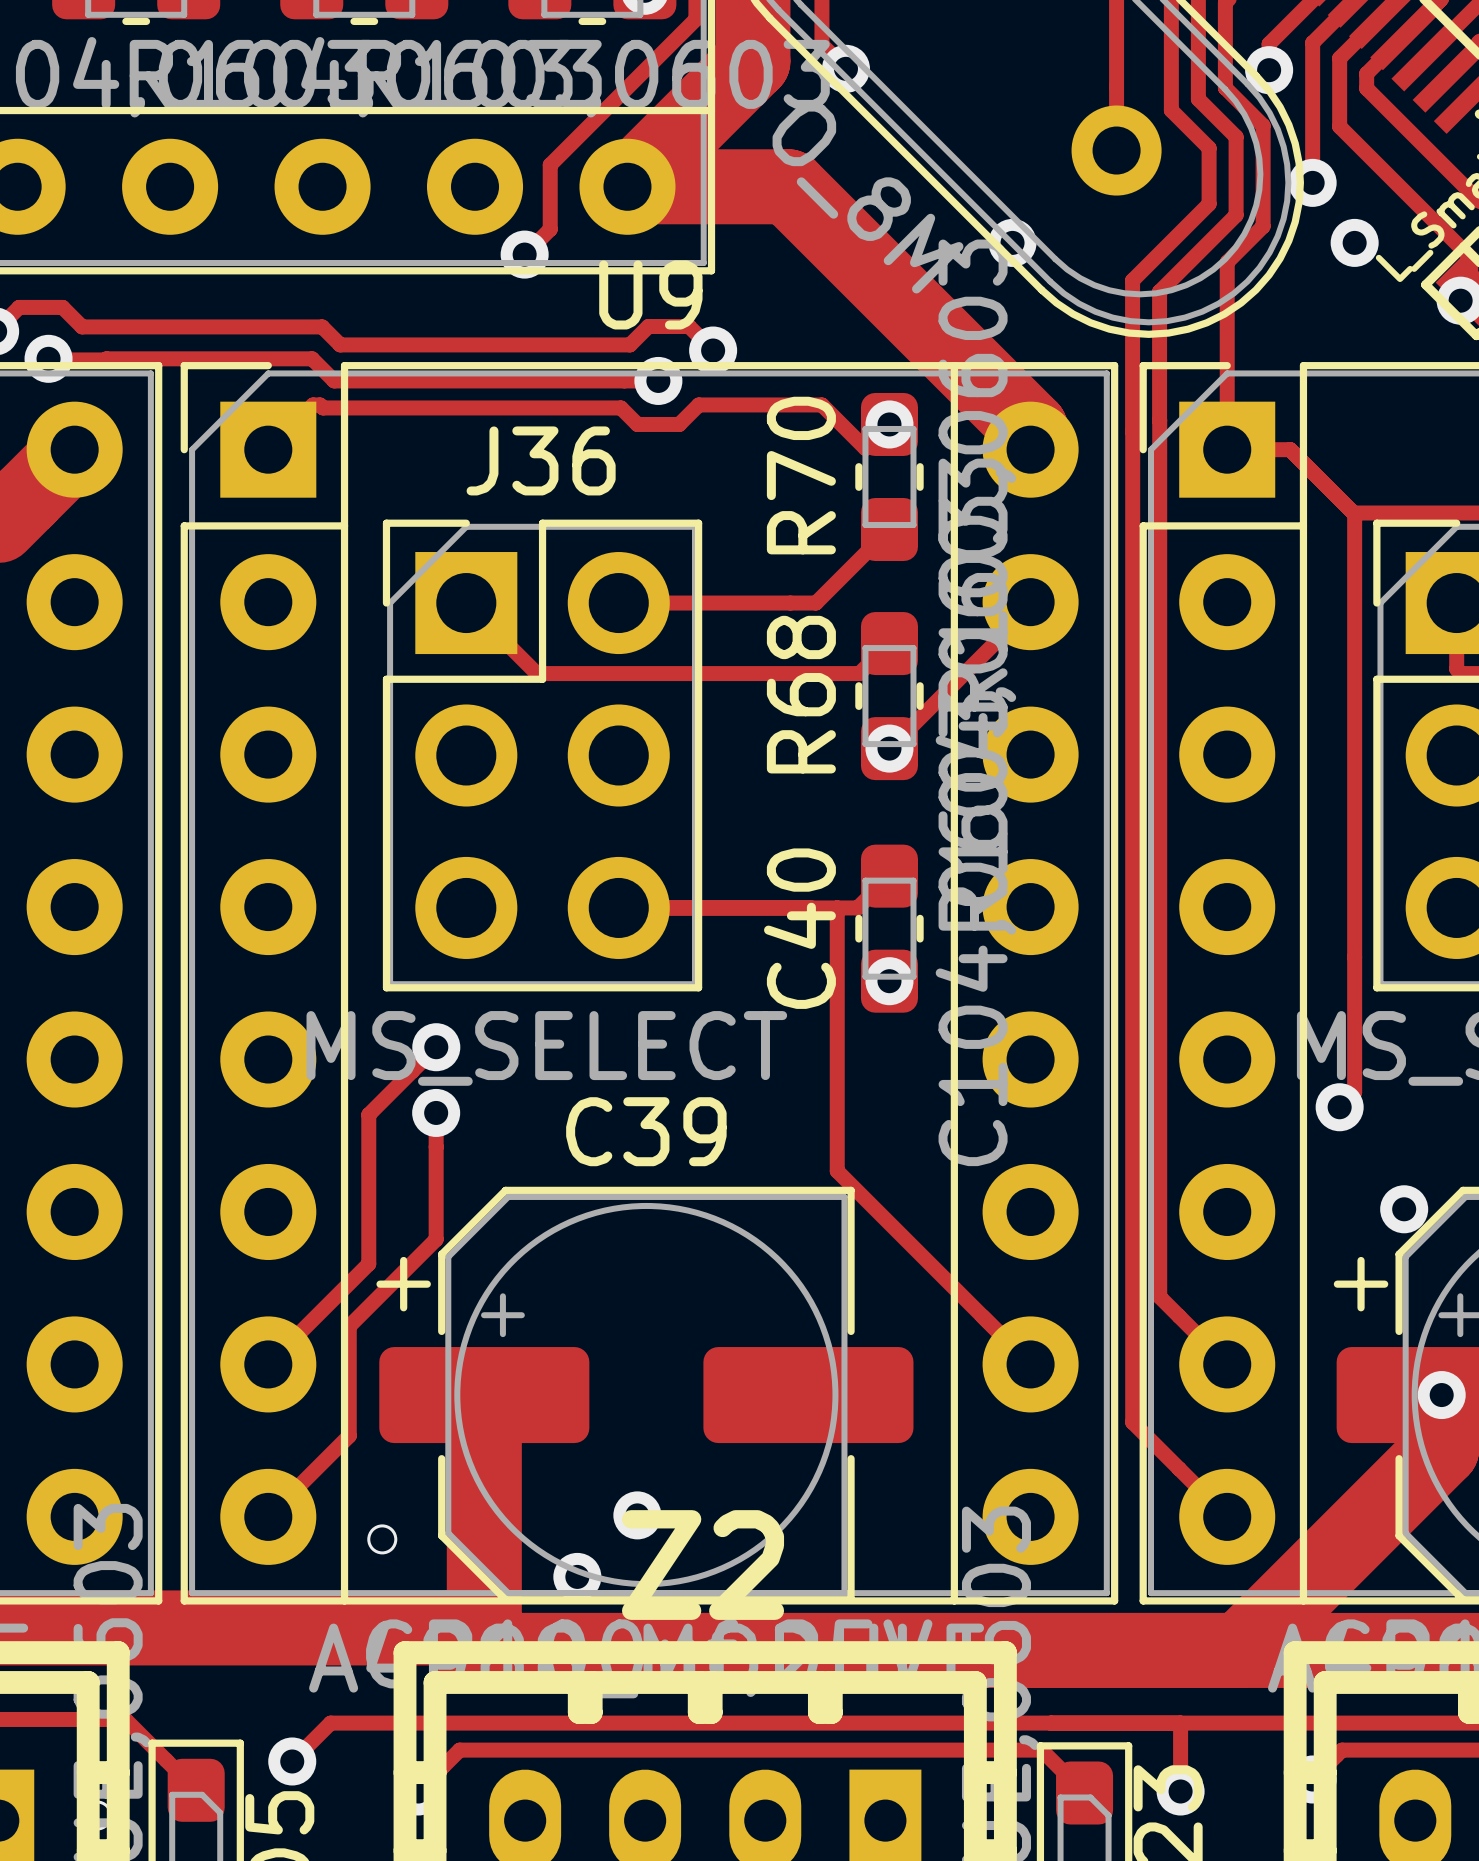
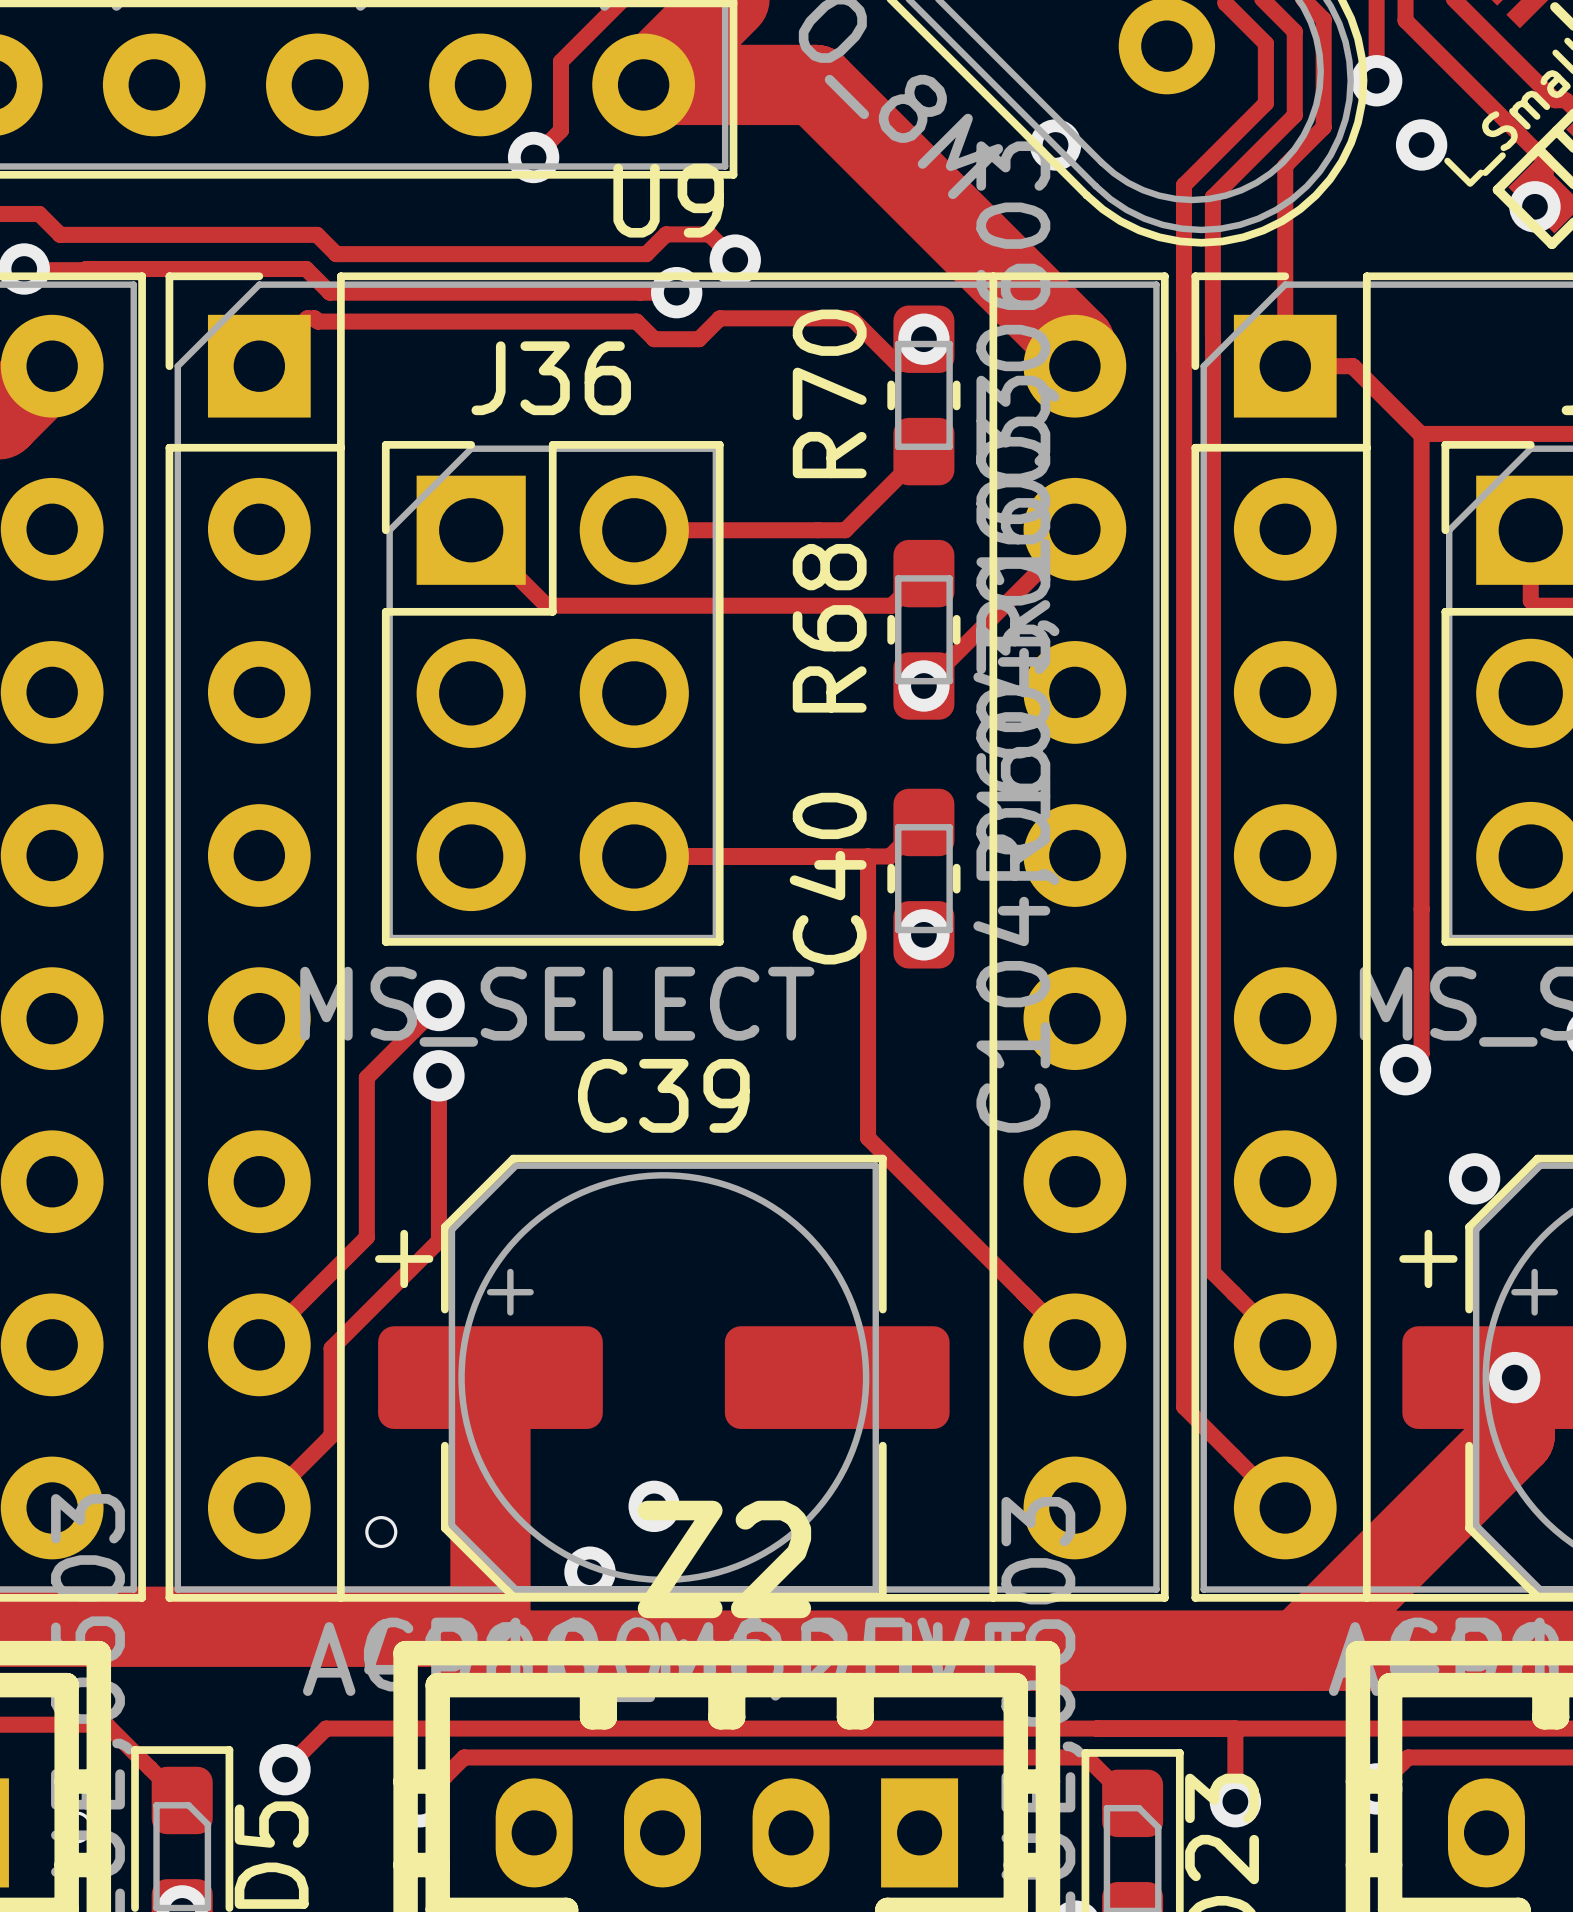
track: (436, 1239) (349, 1326) (349, 1435) (335, 1449) -> (438, 1211) (438, 1241) (331, 1348) (331, 1435)

